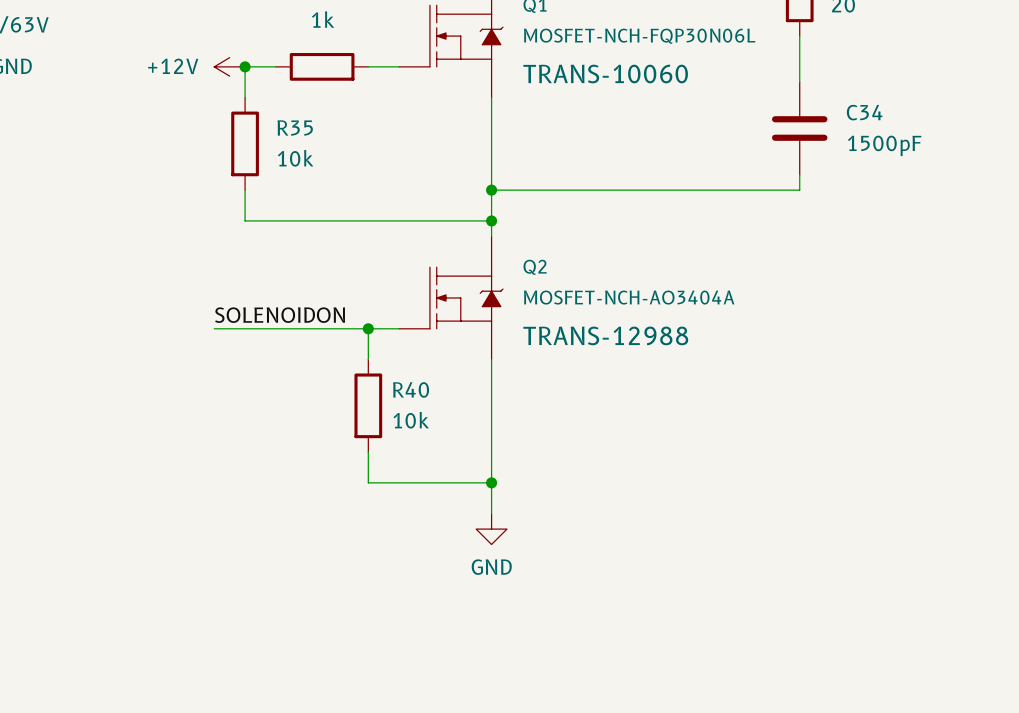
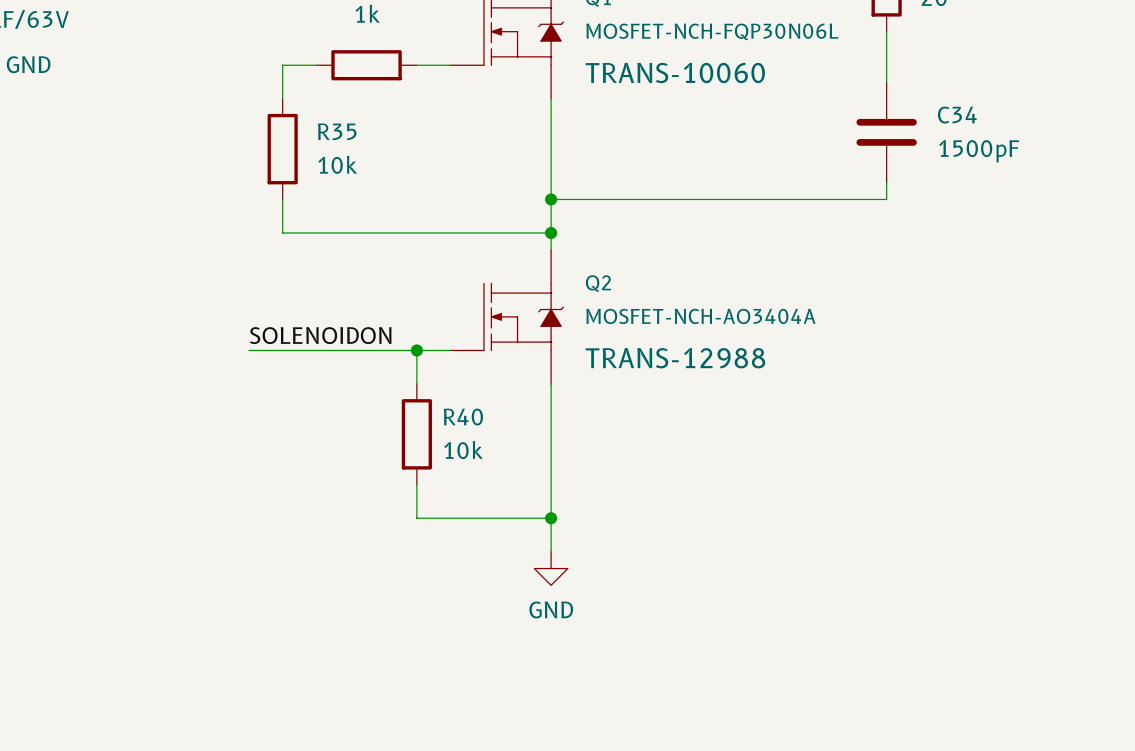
power symbol: +12V (229, 66) -> none
junction: (245, 66) -> none

